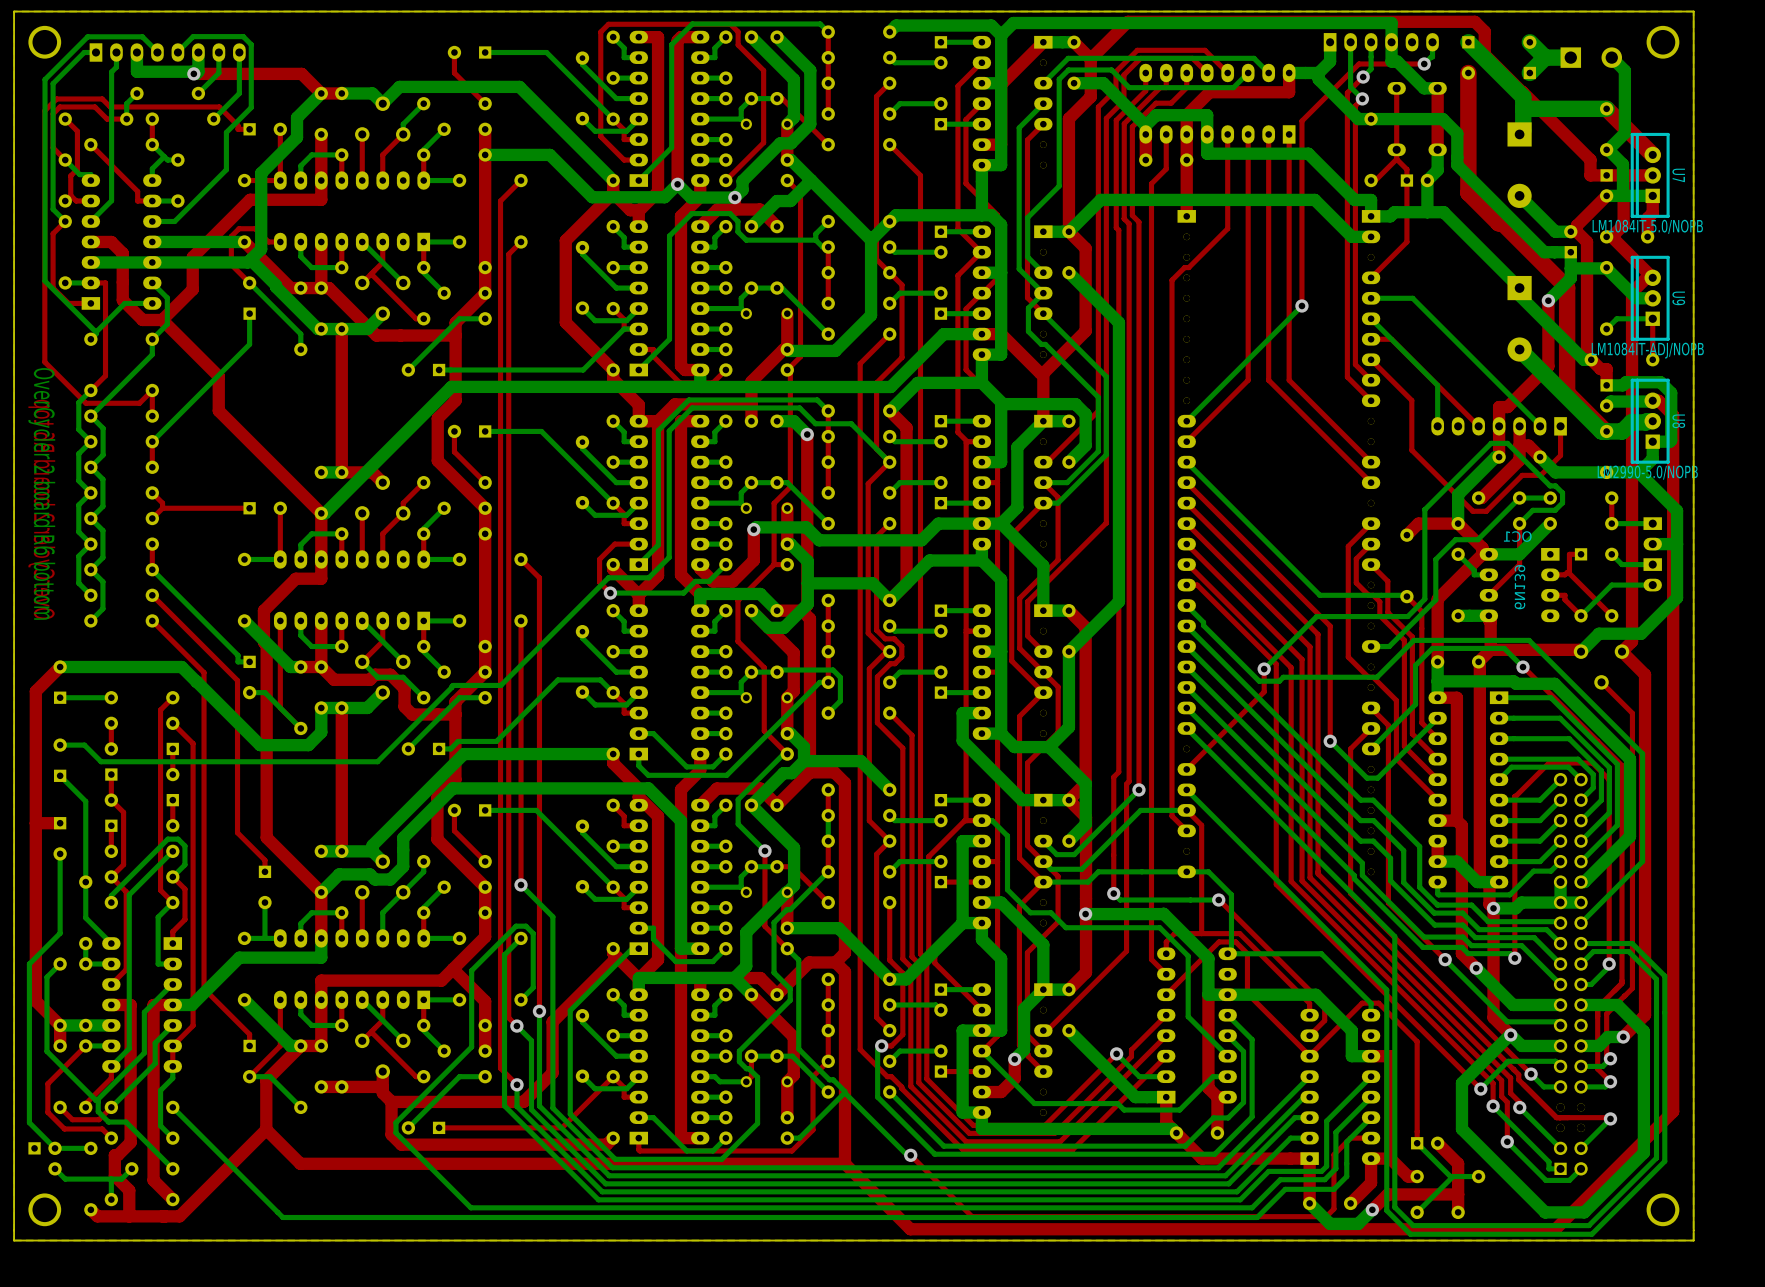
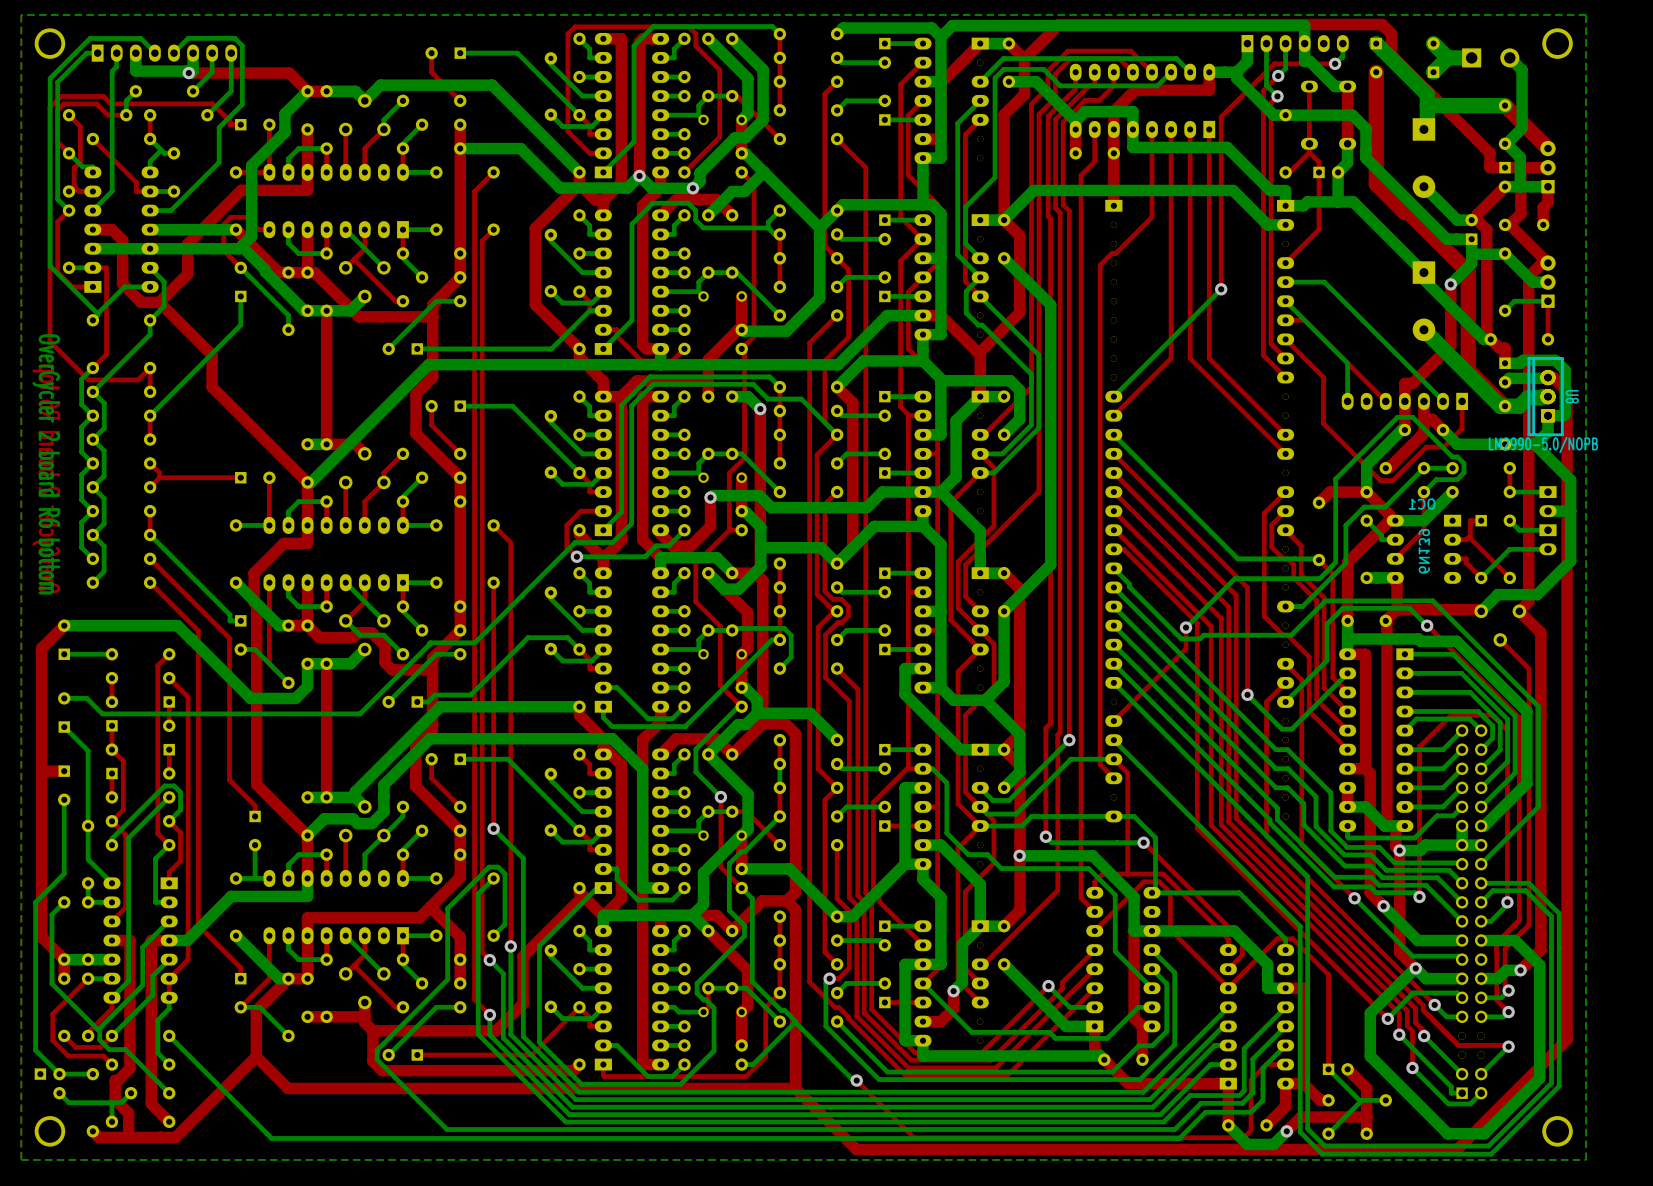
board edge: (1693, 11) (1693, 1240) (14, 1240) (14, 11) (1693, 11) -> none
U7: LM1084IT-5.0/NOPB (1650, 175) -> none
U9: LM1084IT-ADJ/NOPB (1650, 298) -> none
part: none -> (1547, 396)

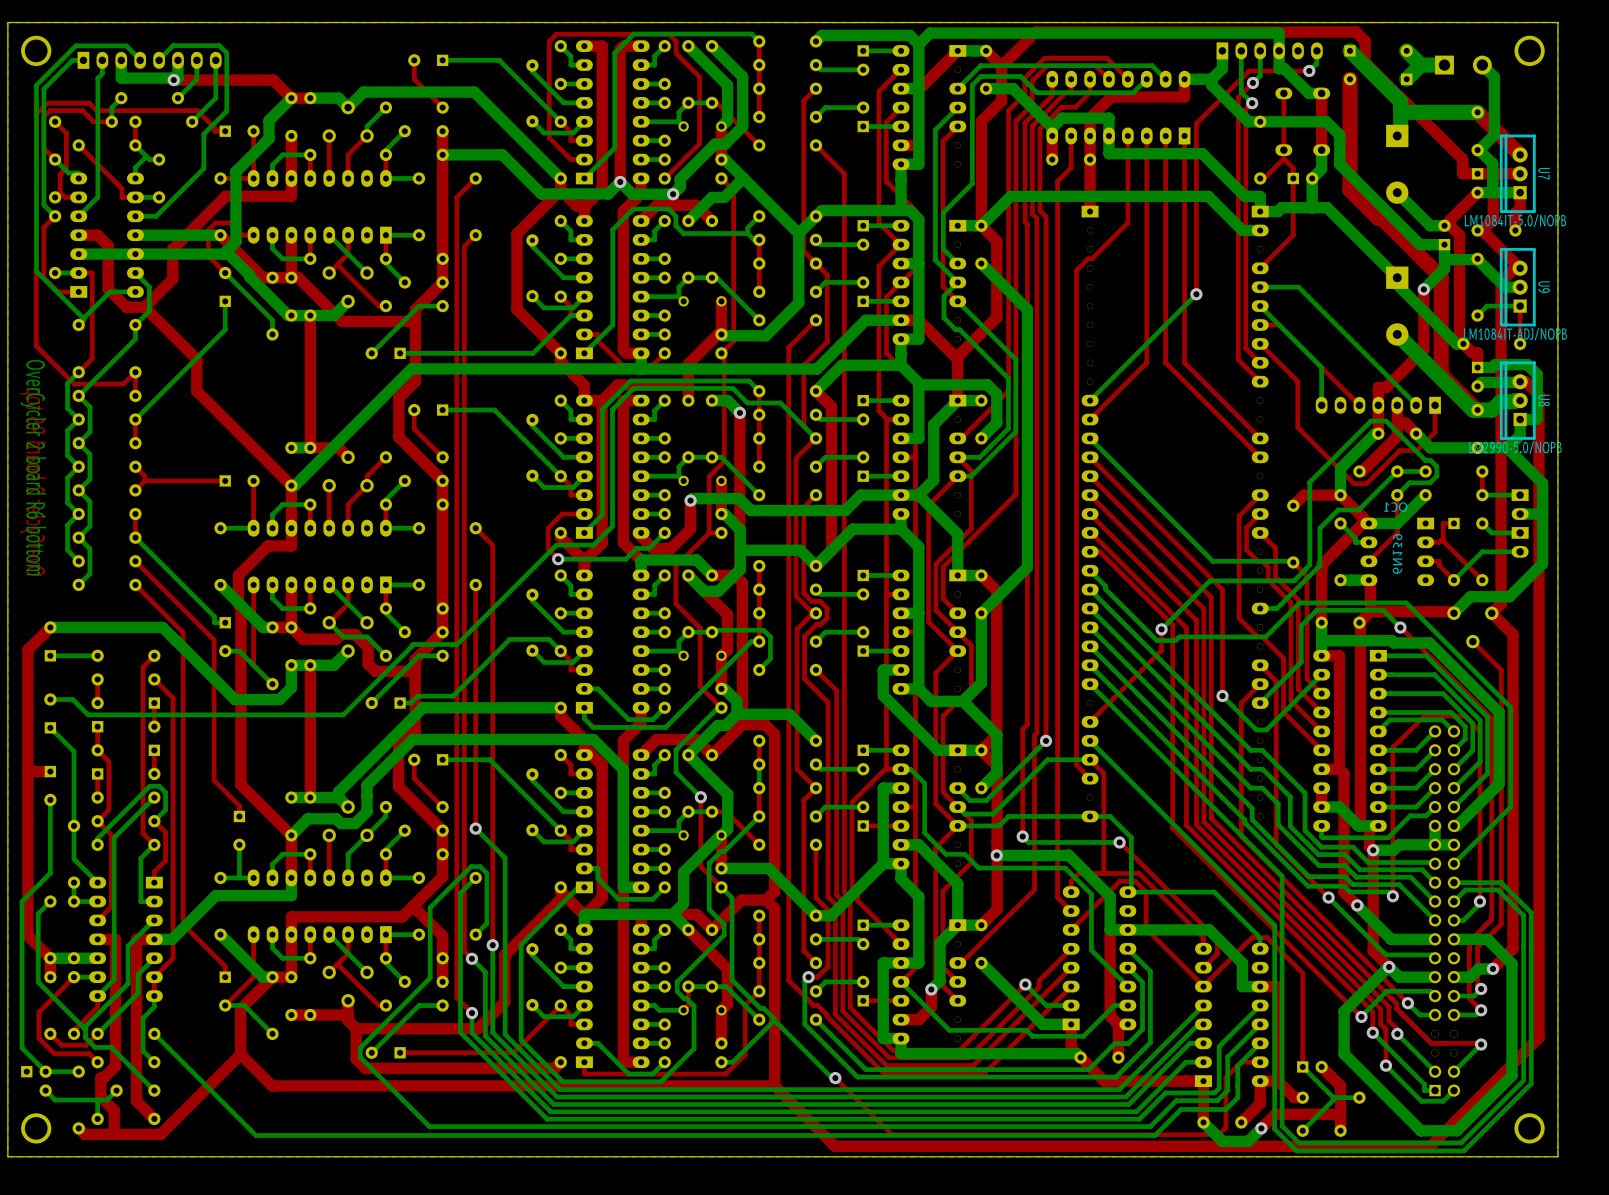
board edge: none -> (1557, 22) (1557, 1156) (7, 1156) (7, 22) (1557, 22)
U7: none -> LM1084IT-5.0/NOPB (1517, 173)
U9: none -> LM1084IT-ADJ/NOPB (1517, 287)
part: (1547, 396) -> none

